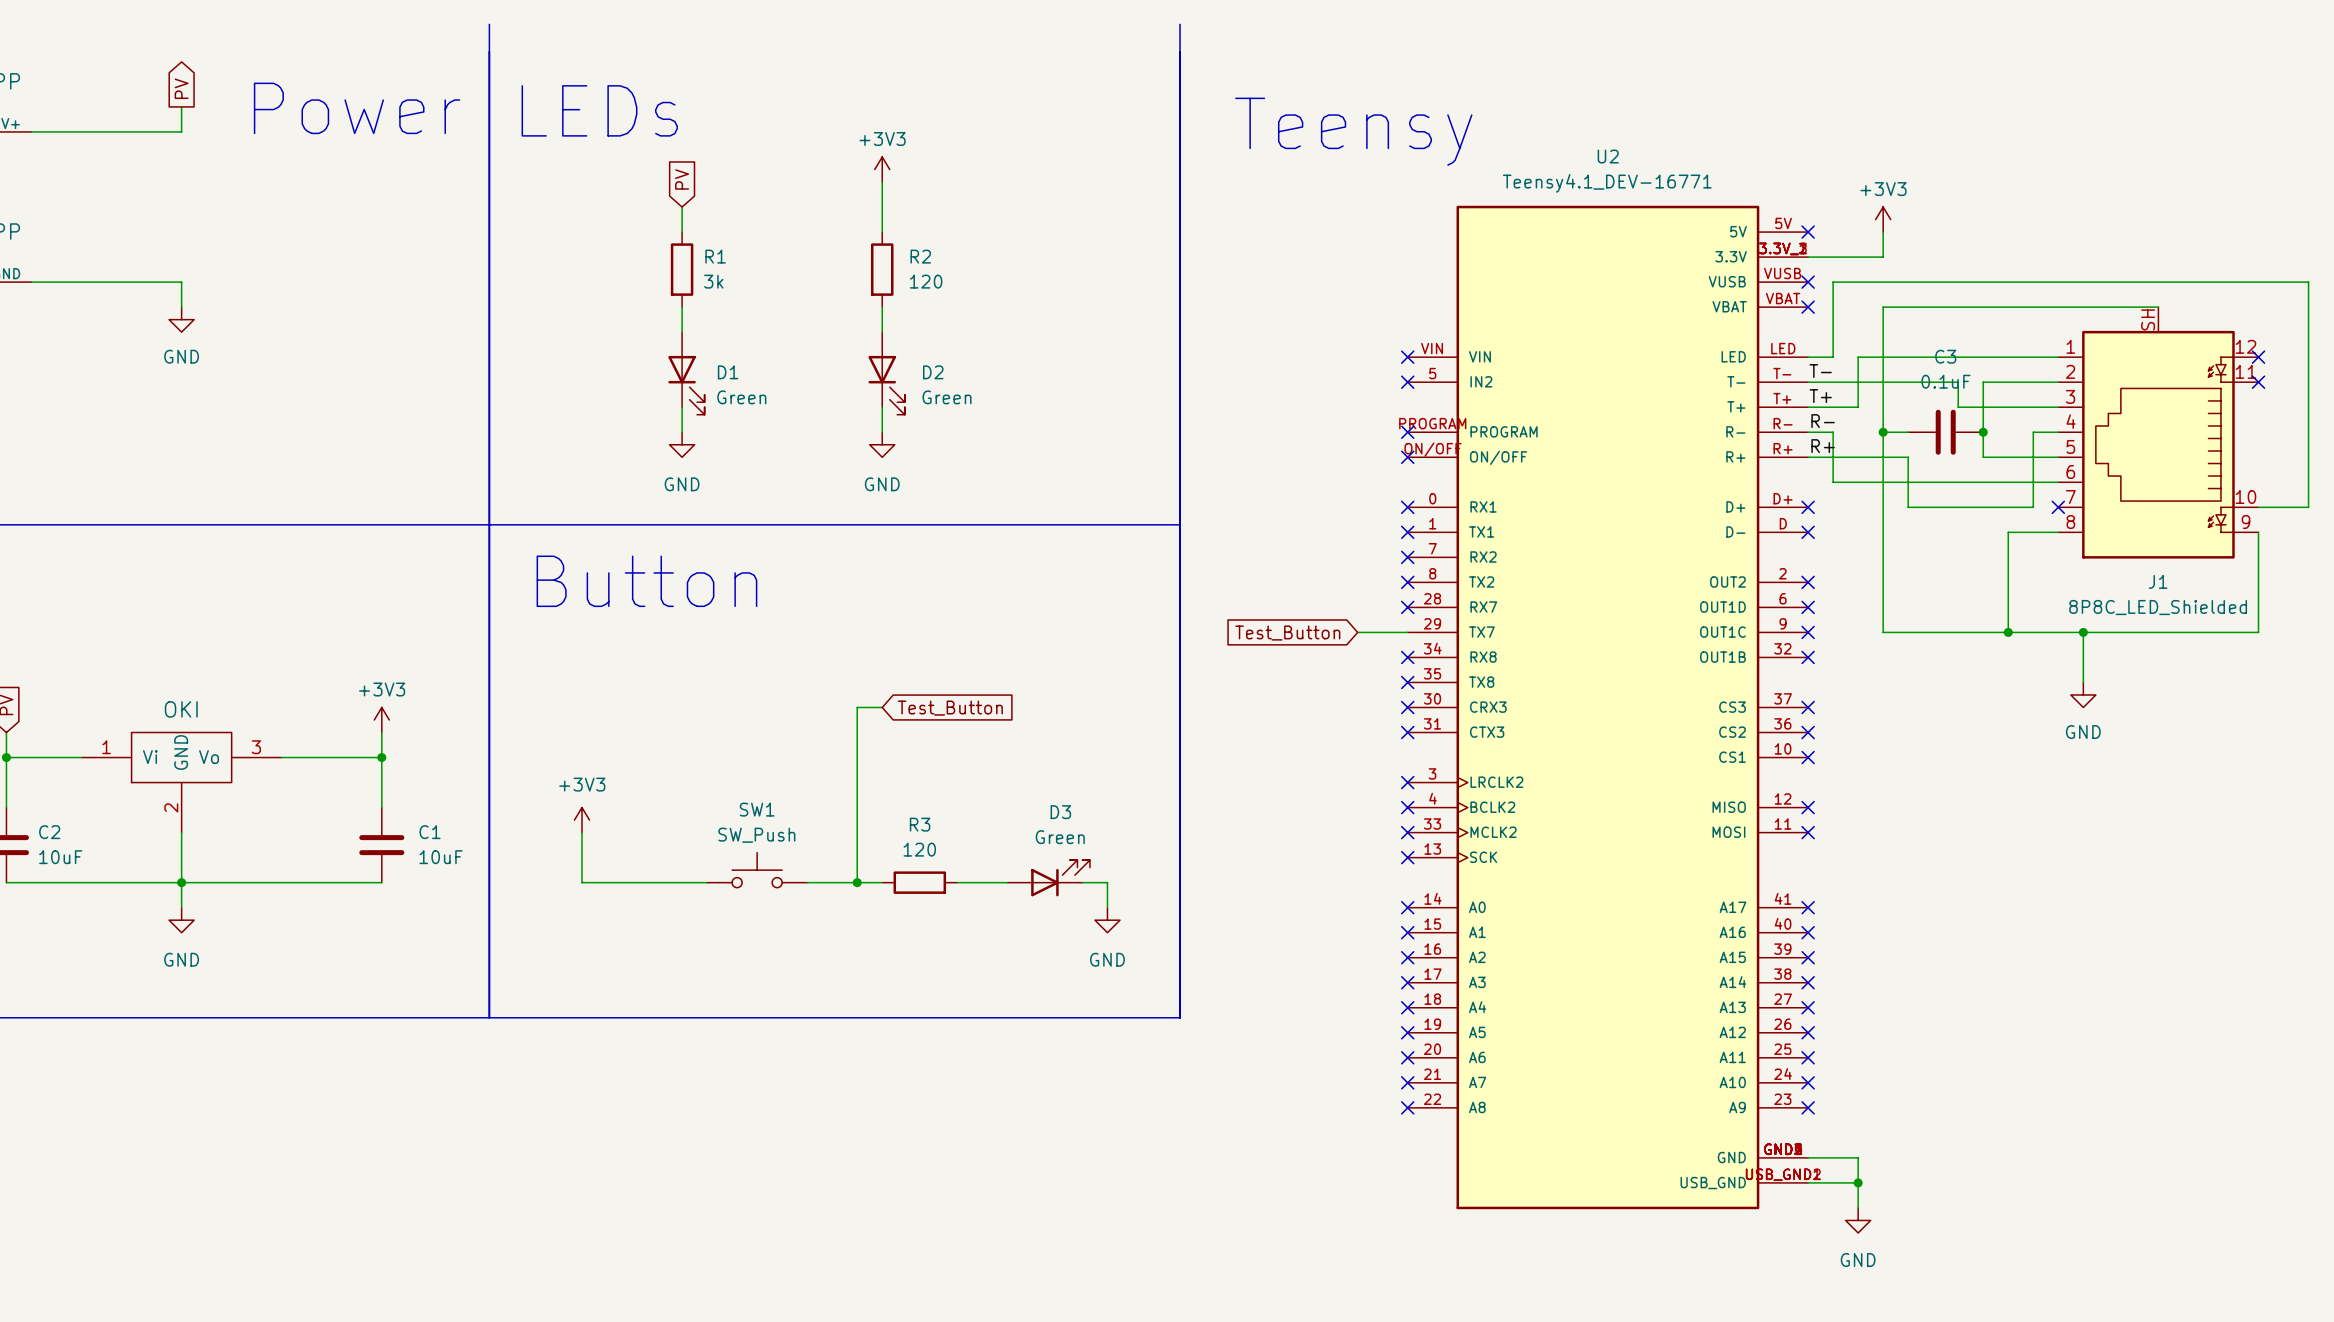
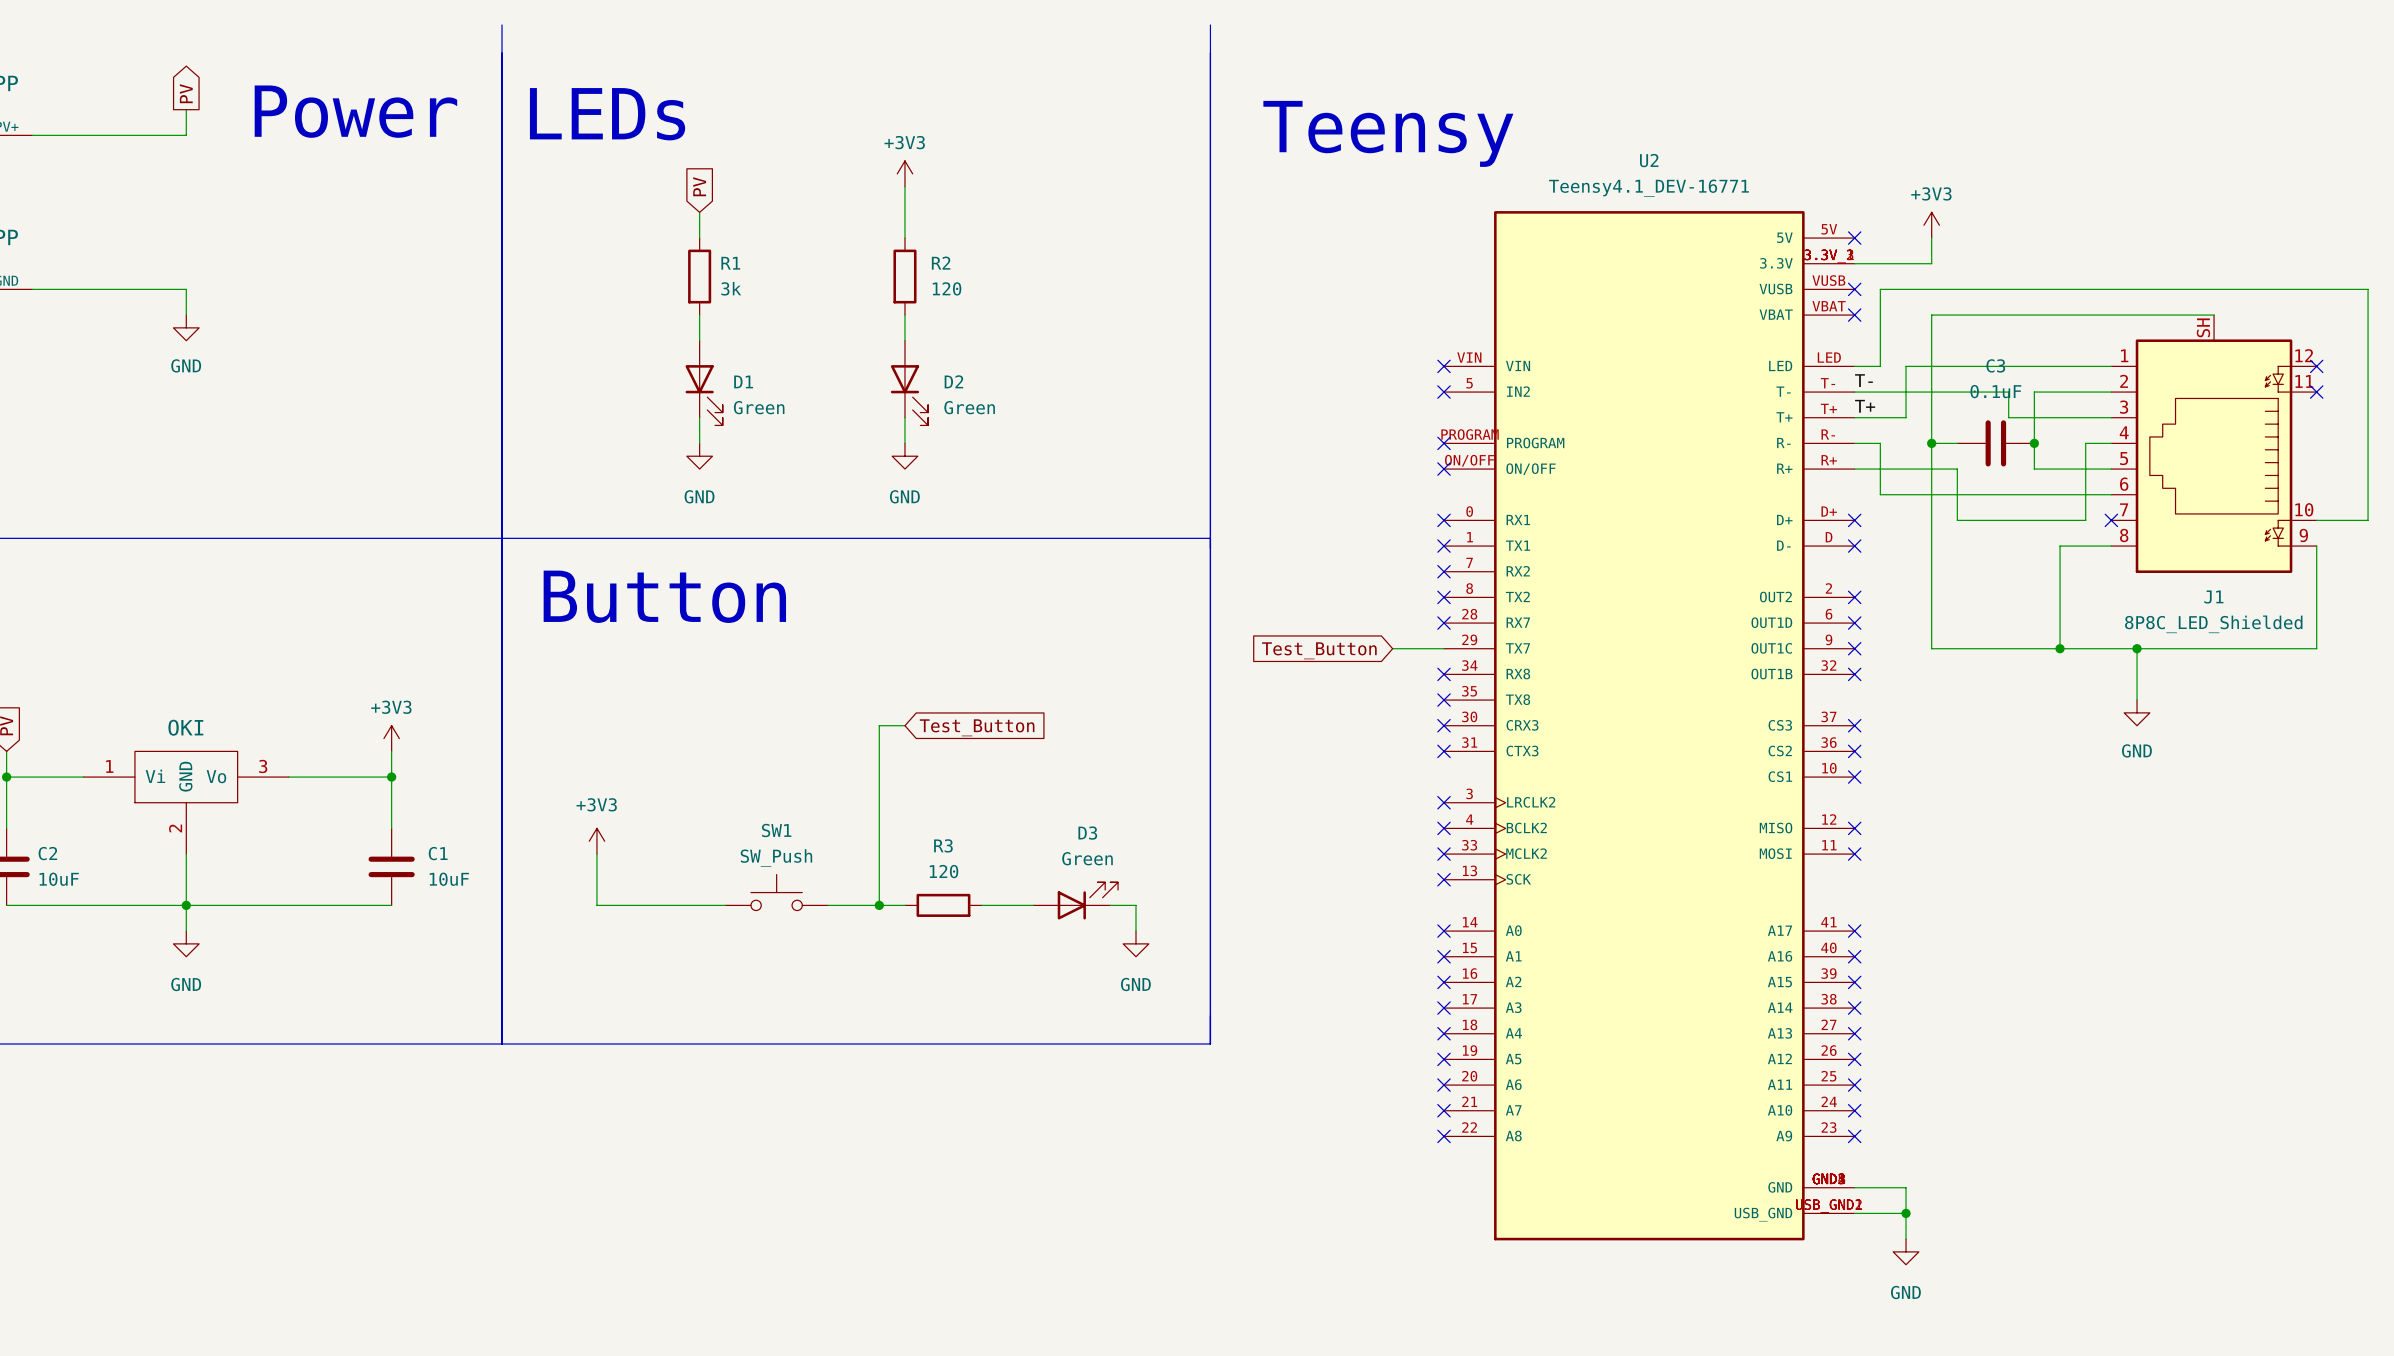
label: R- (1823, 421) -> none
label: R+ (1823, 446) -> none

